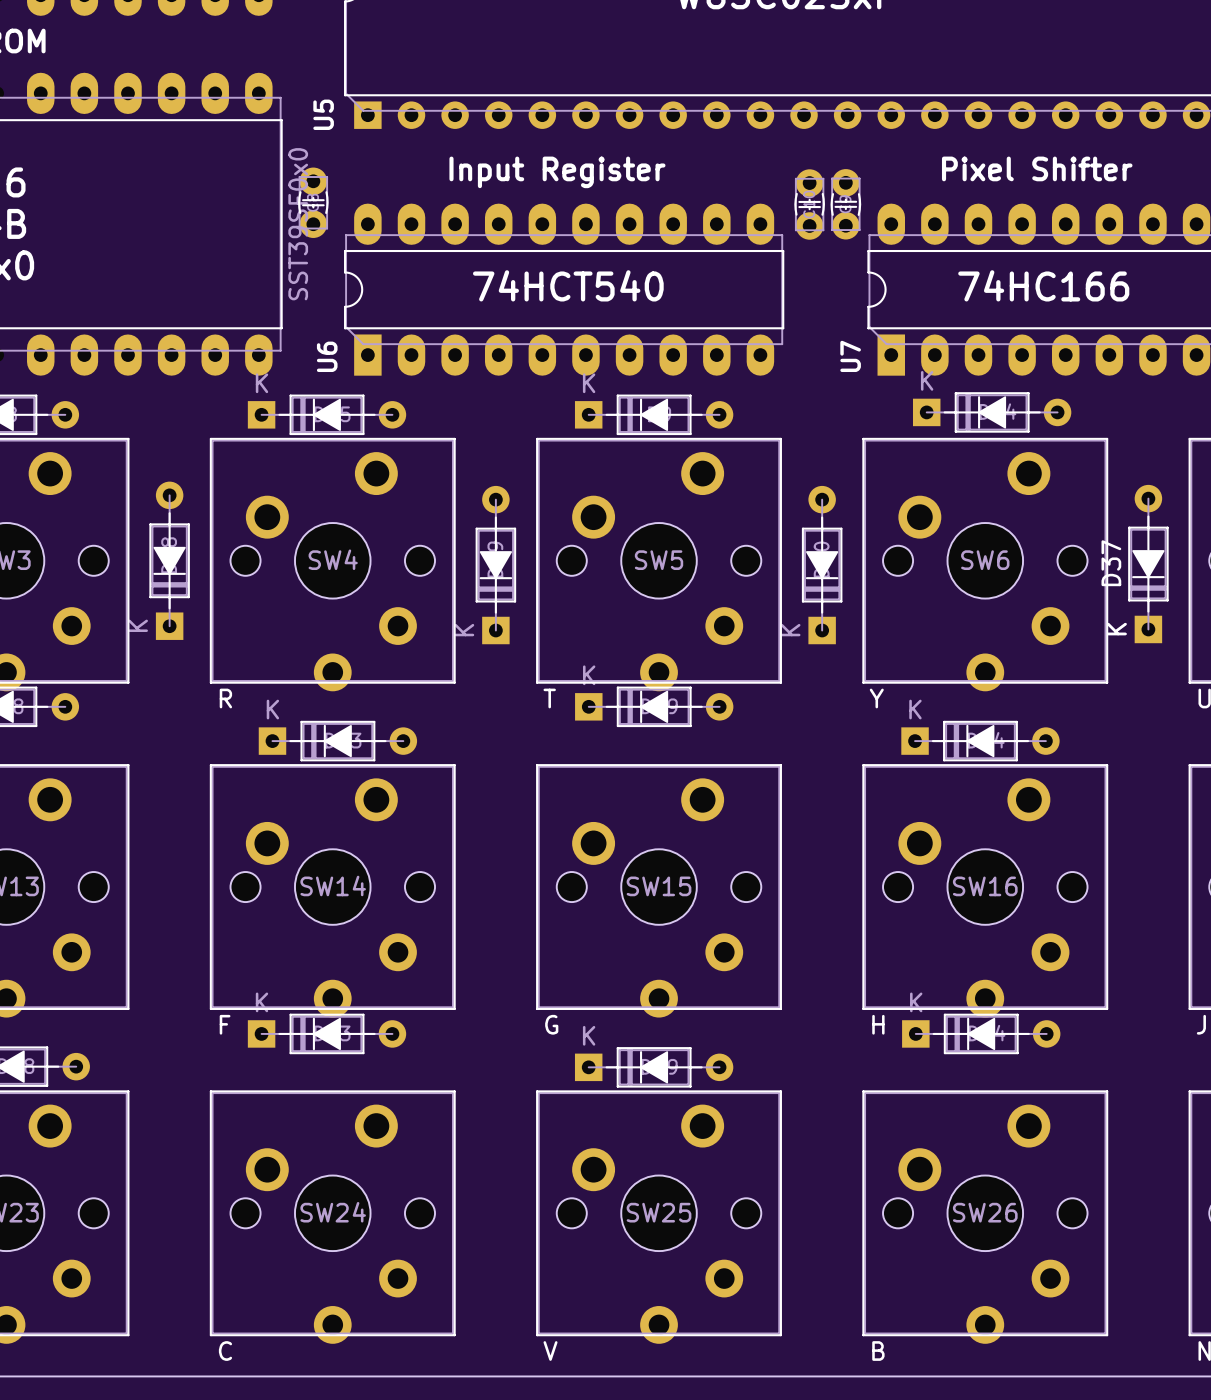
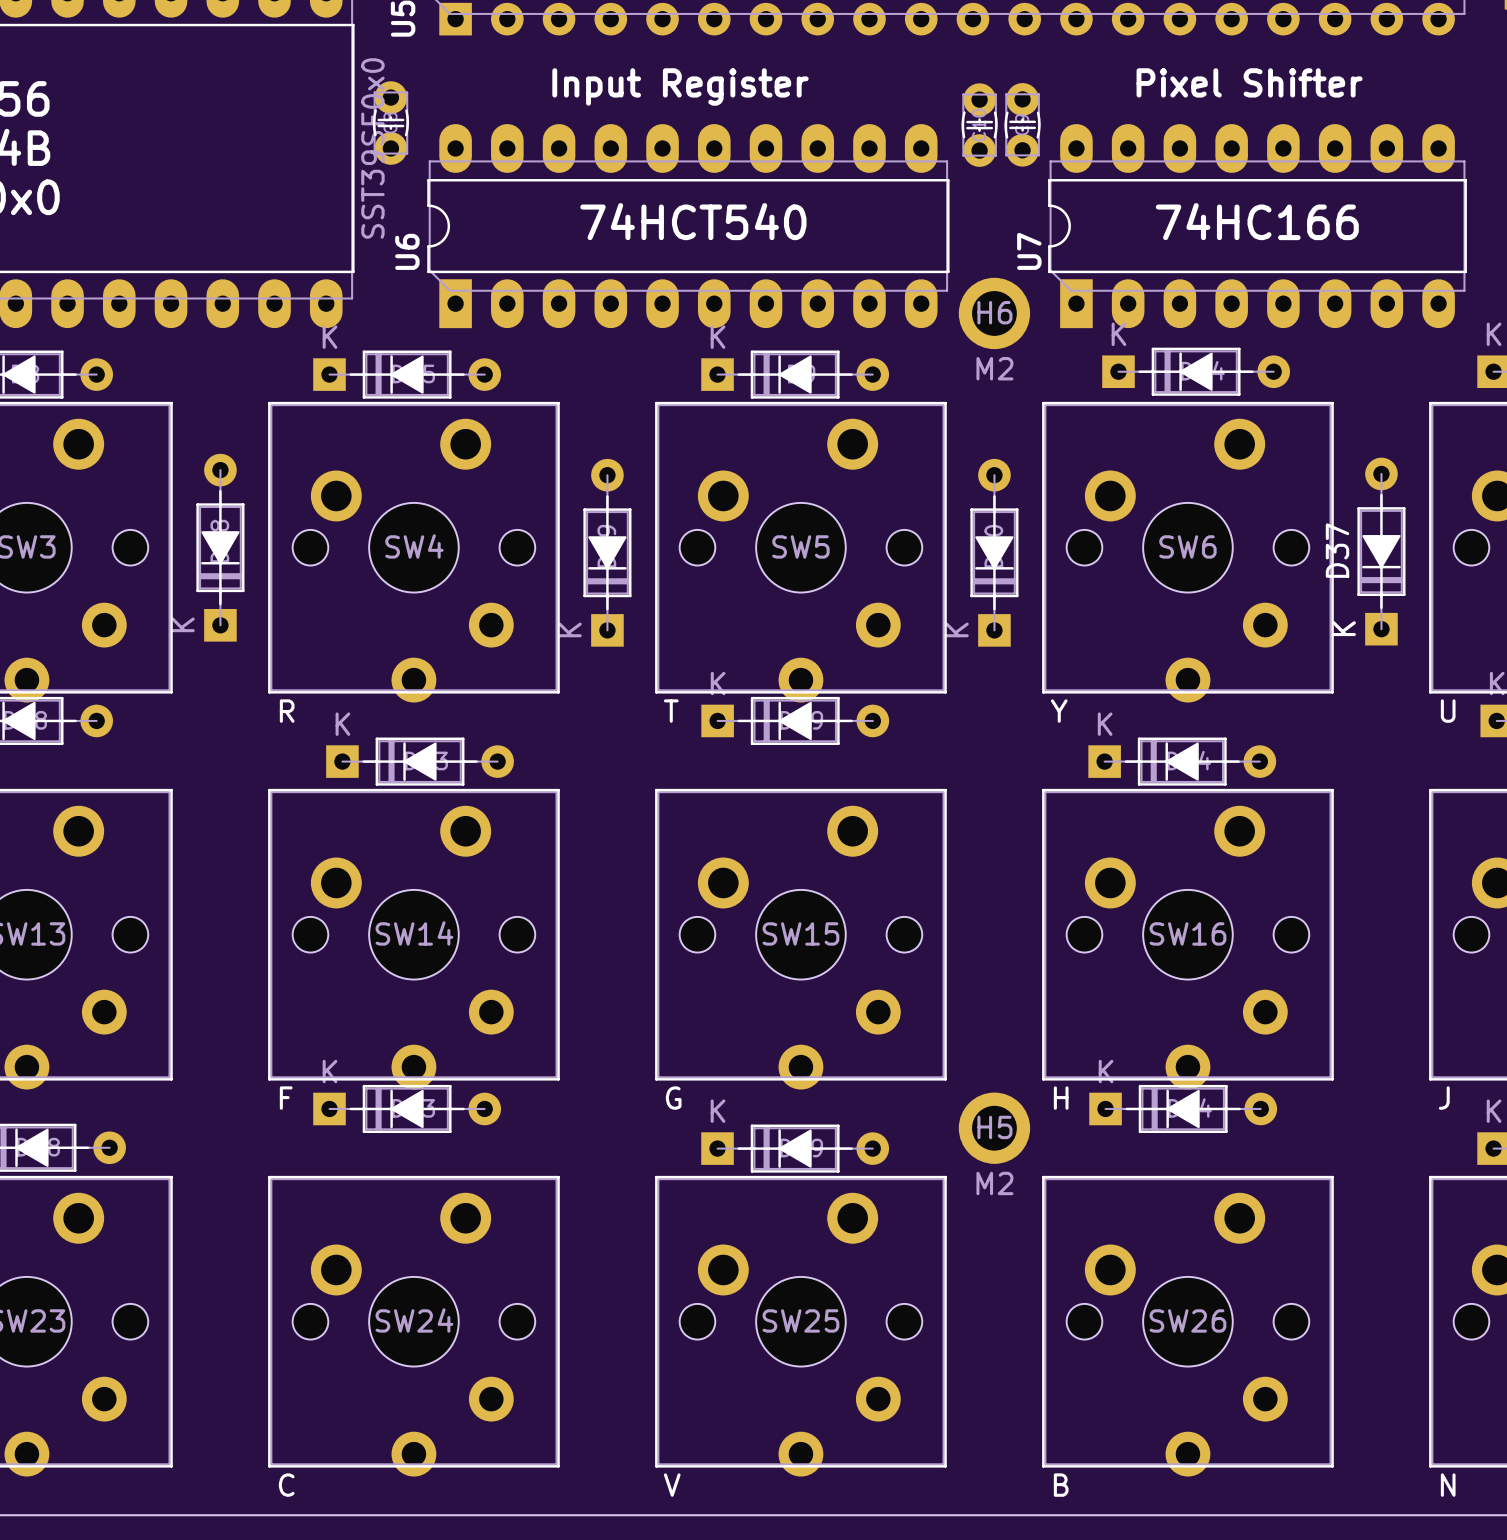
U6 name position: U6 (327, 356) -> U6 (407, 251)
U7 name position: U7 (850, 356) -> U7 (1029, 251)
H6: none -> M2 (994, 313)
H5: none -> M2 (994, 1128)

